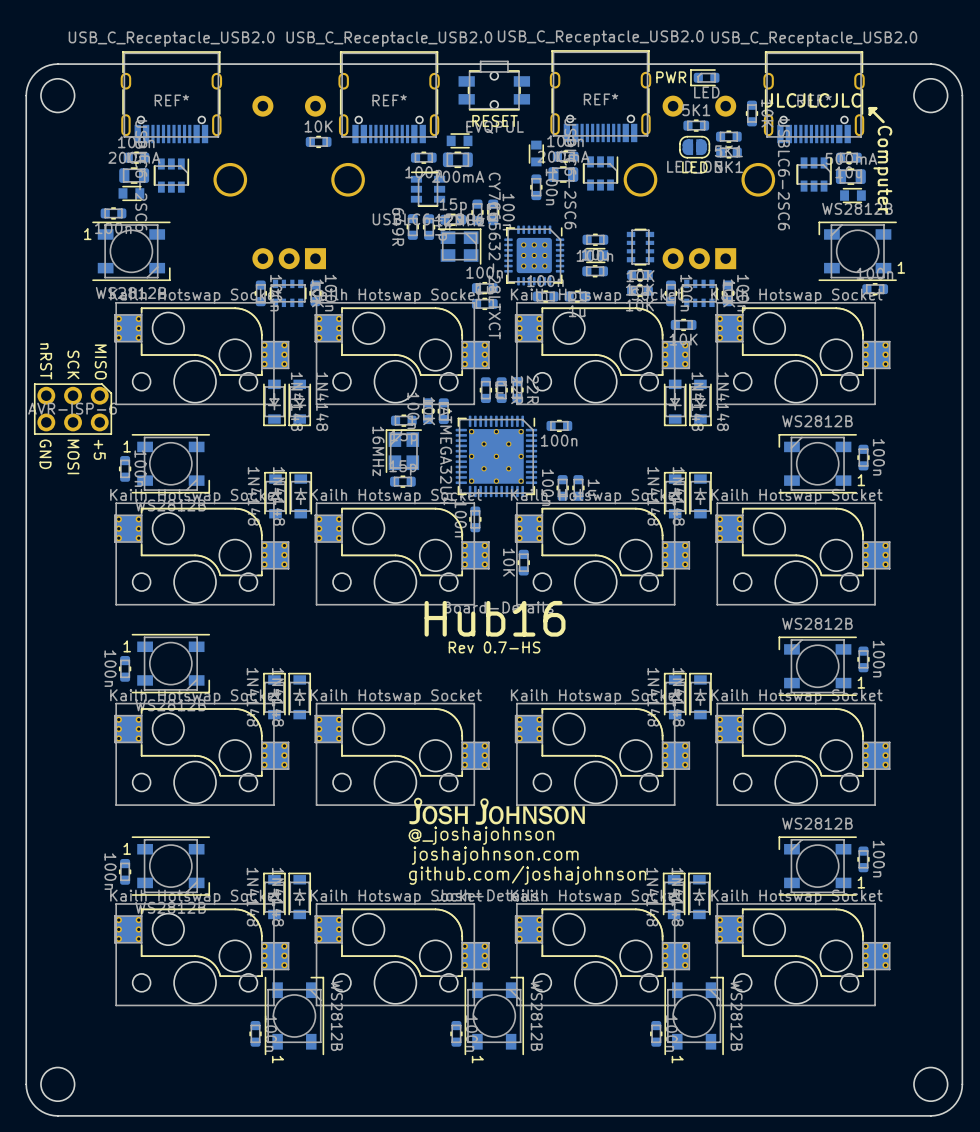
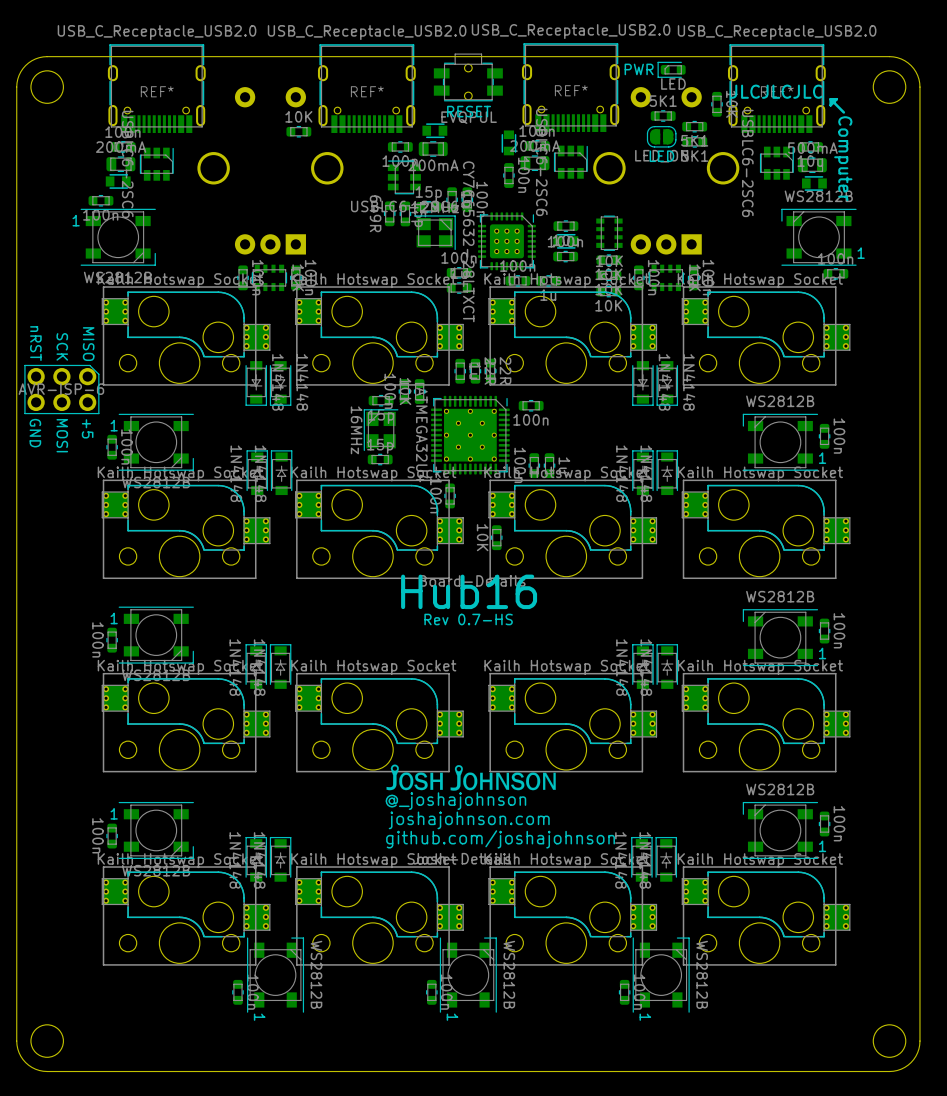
part position: (683, 324) -> (608, 291)

